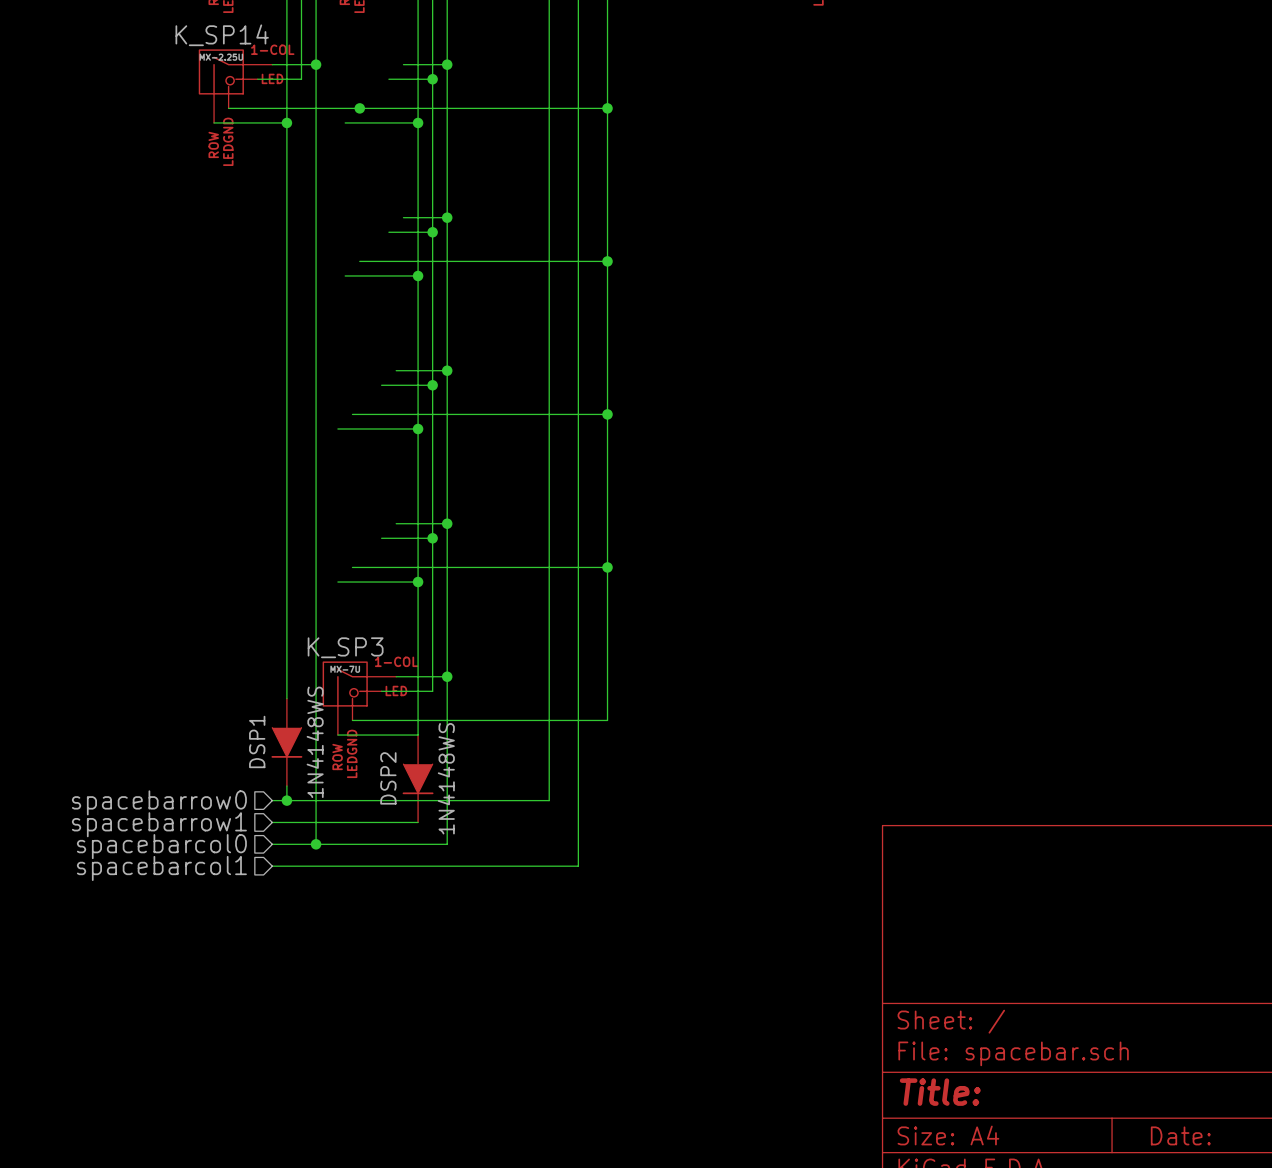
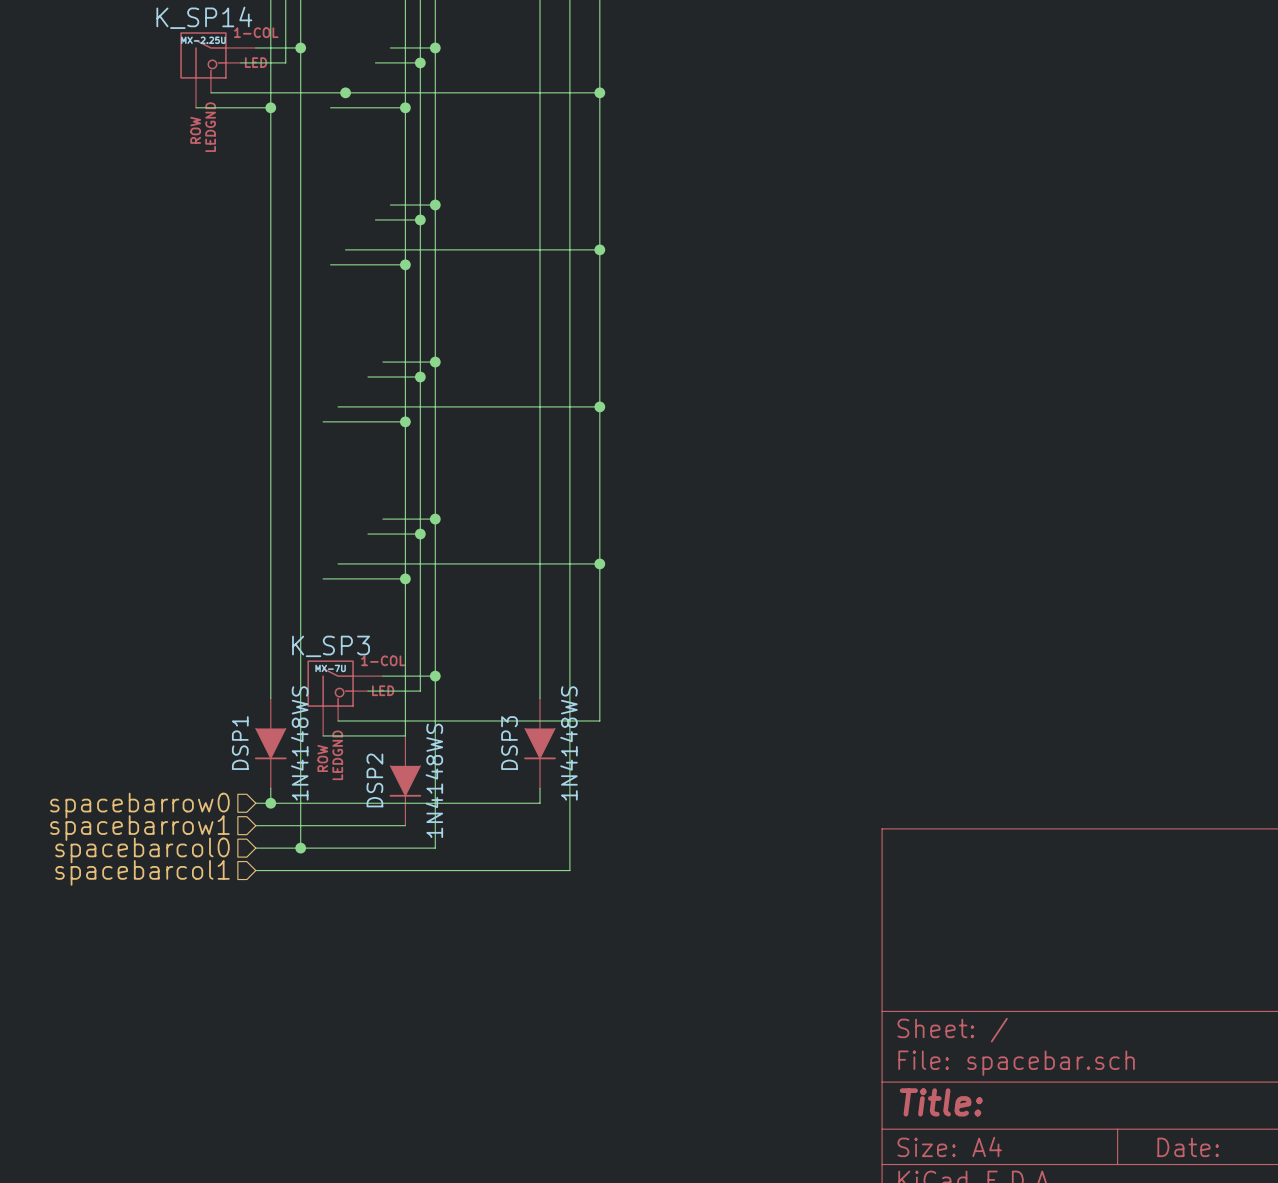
DSP3: none -> 1N4148WS (539, 743)

